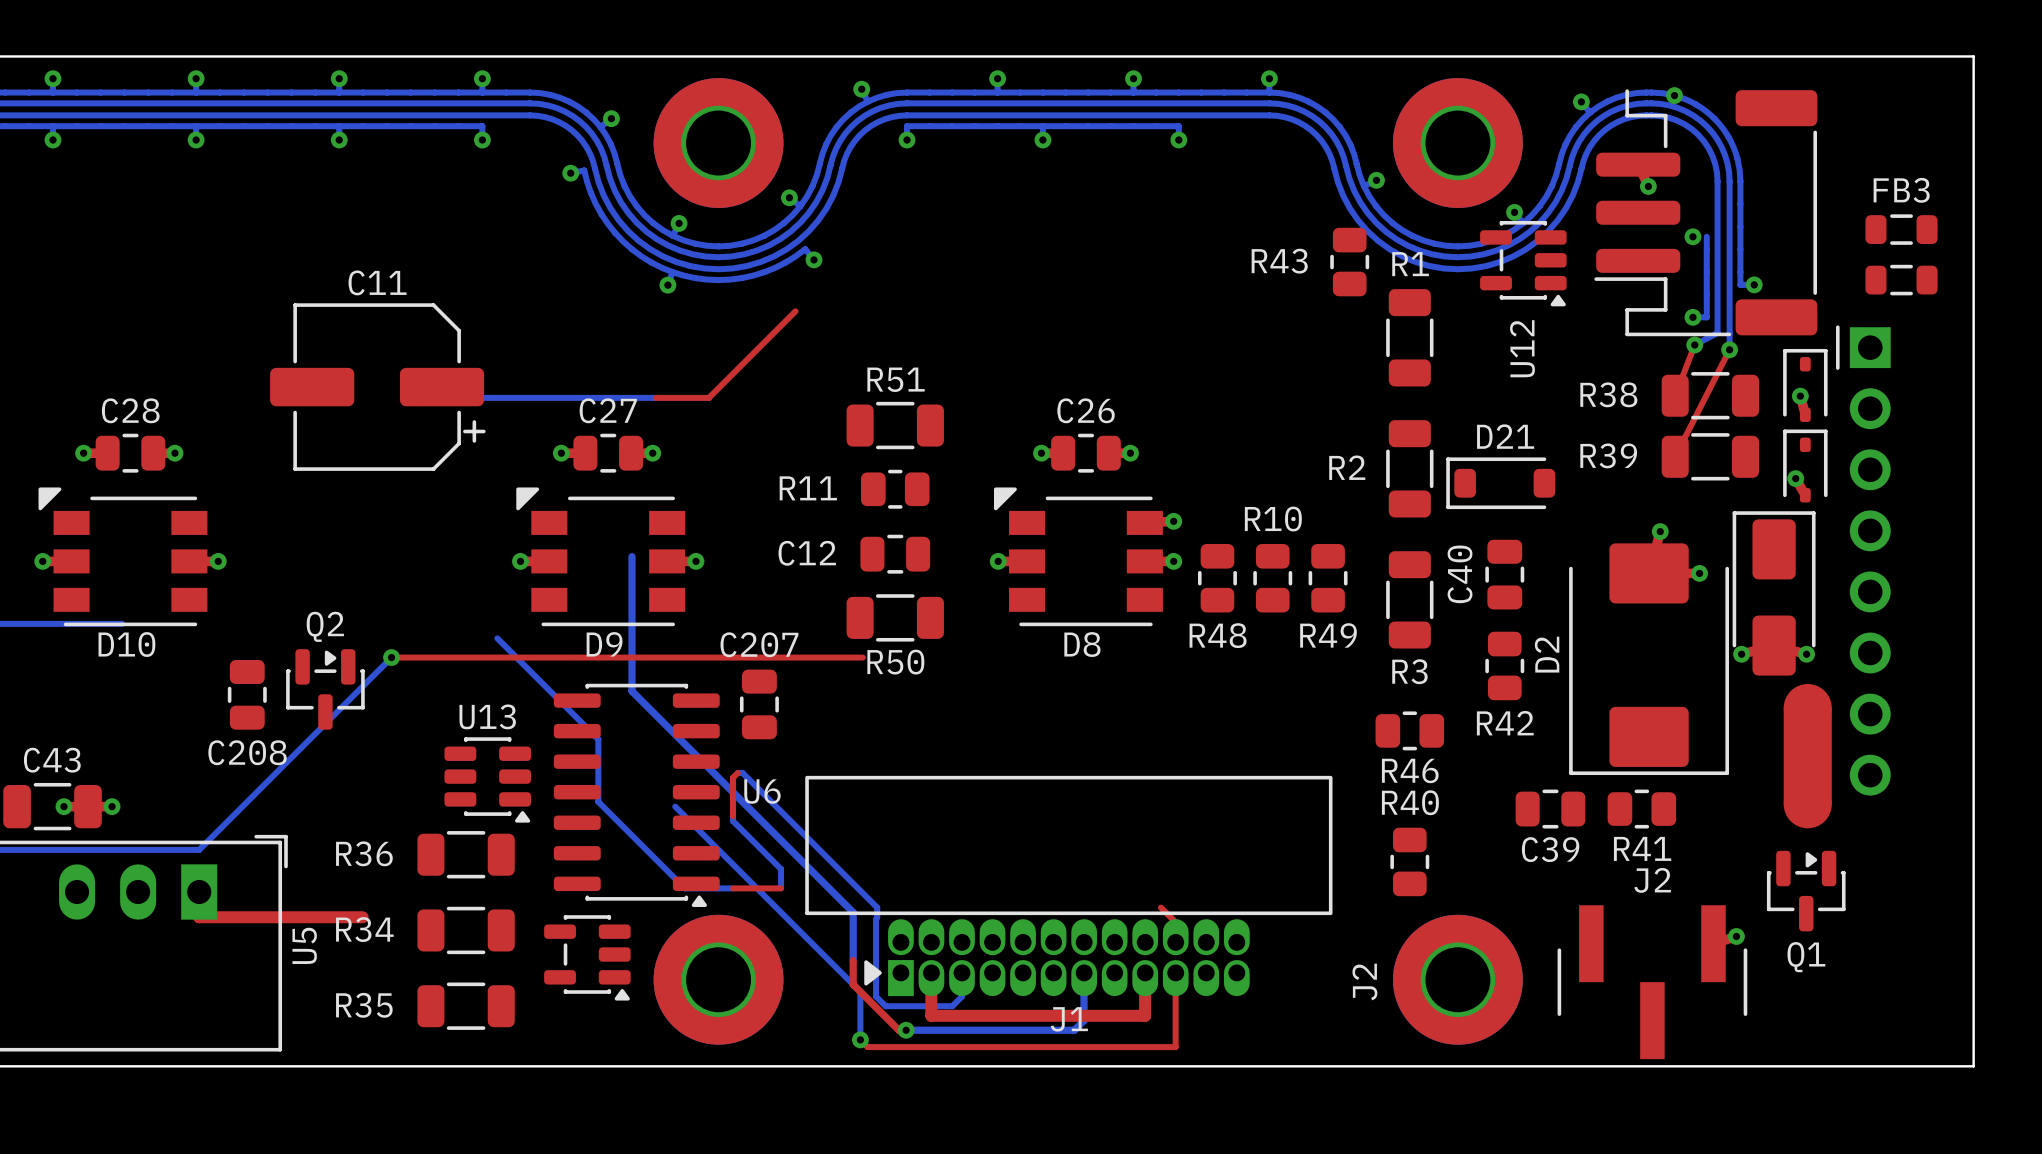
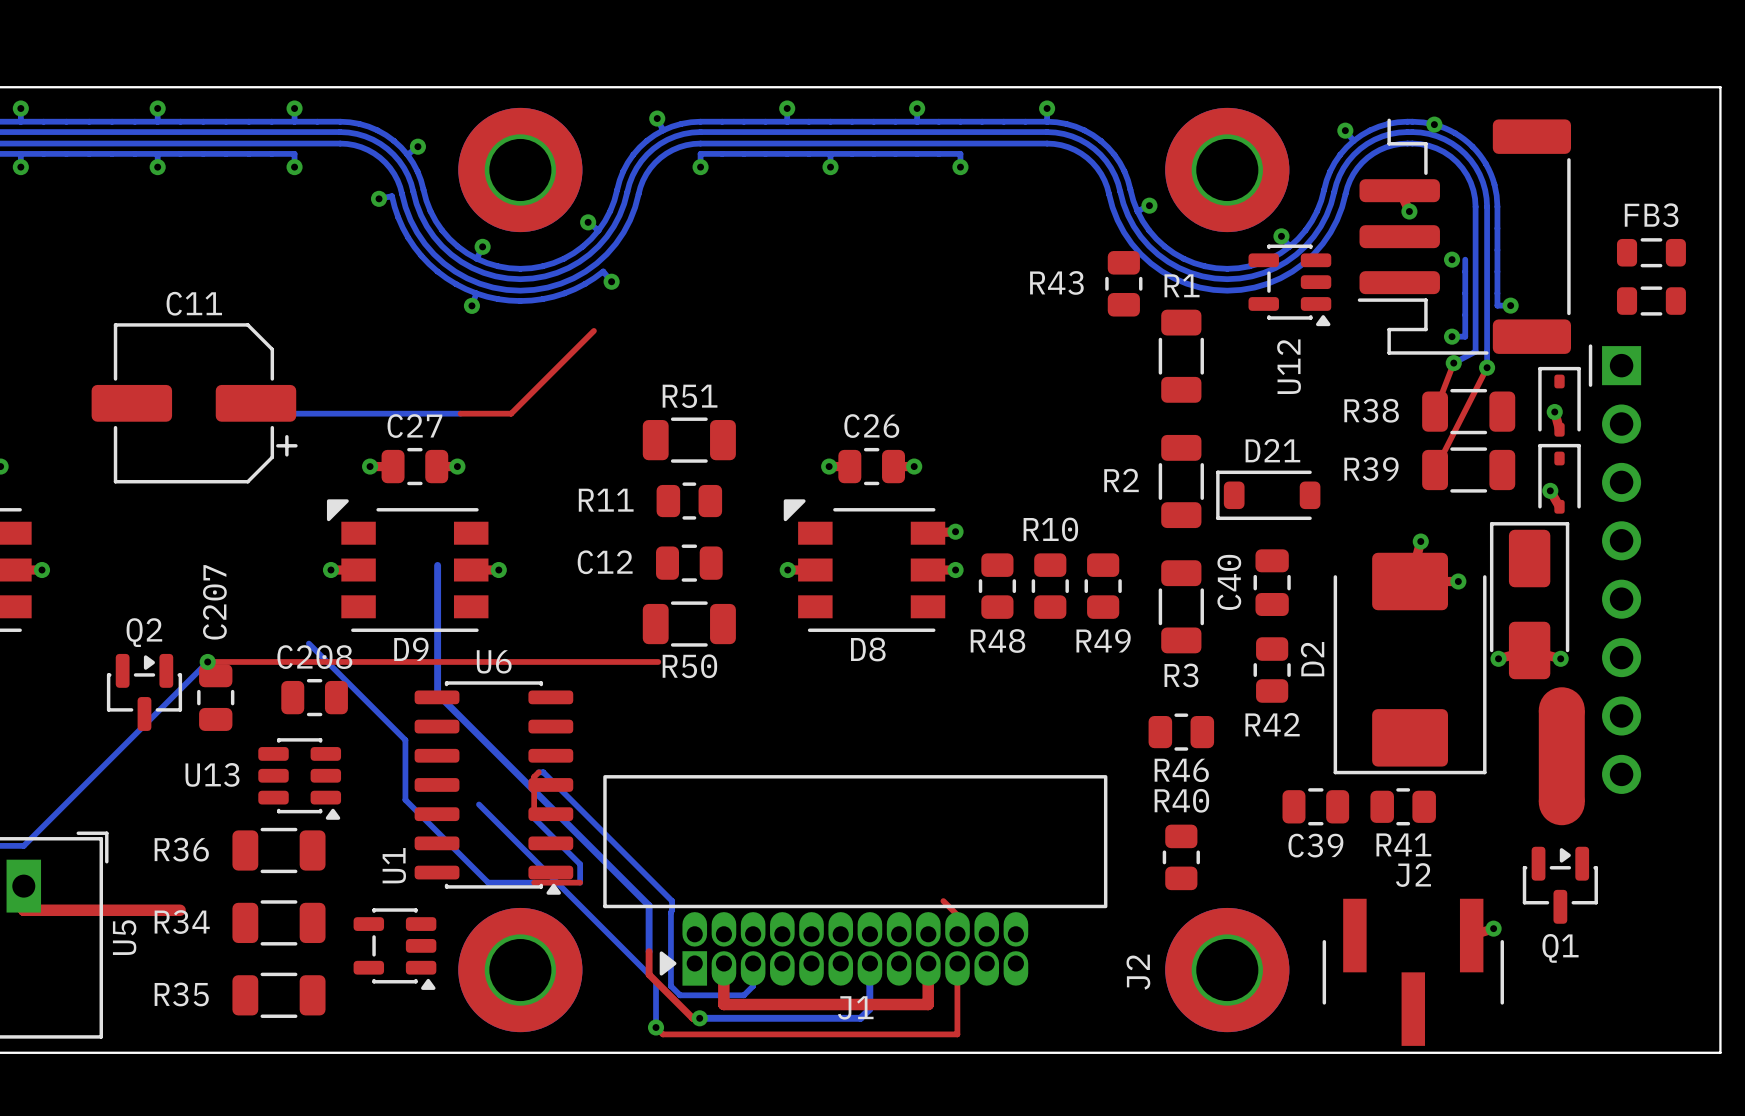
text rotation: 0° (759, 644) -> 90° counterclockwise (214, 602)
text position: C207 (759, 644) -> C207 (214, 602)
part: (247, 694) -> none
part: none -> (215, 697)
part: none -> (314, 697)
part: (759, 704) -> none
text position: U13 (487, 716) -> U13 (212, 774)
text position: C208 (247, 752) -> C208 (314, 657)
text position: U6 (762, 791) -> U6 (494, 661)
part position: (636, 795) -> (493, 788)
text: none -> U1 (394, 865)

